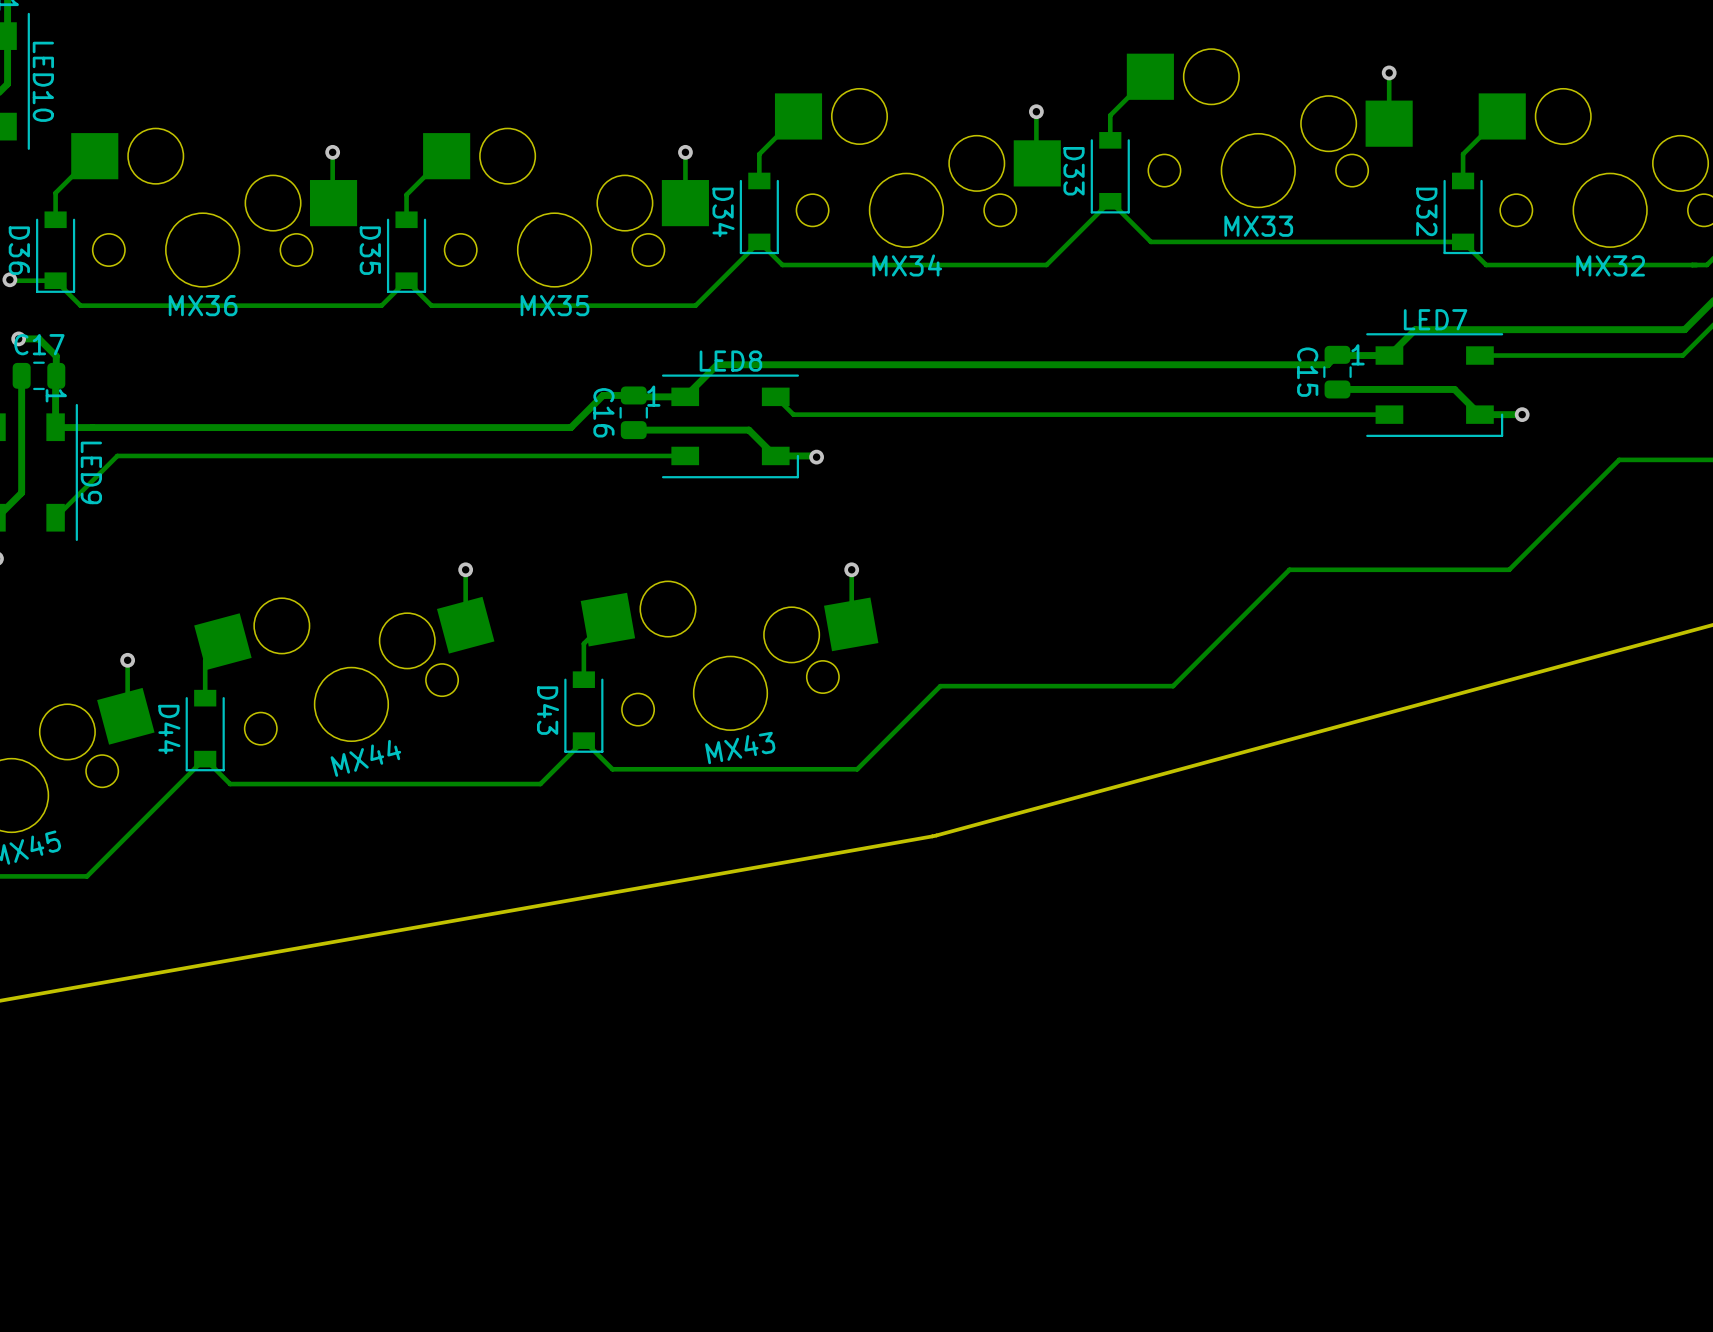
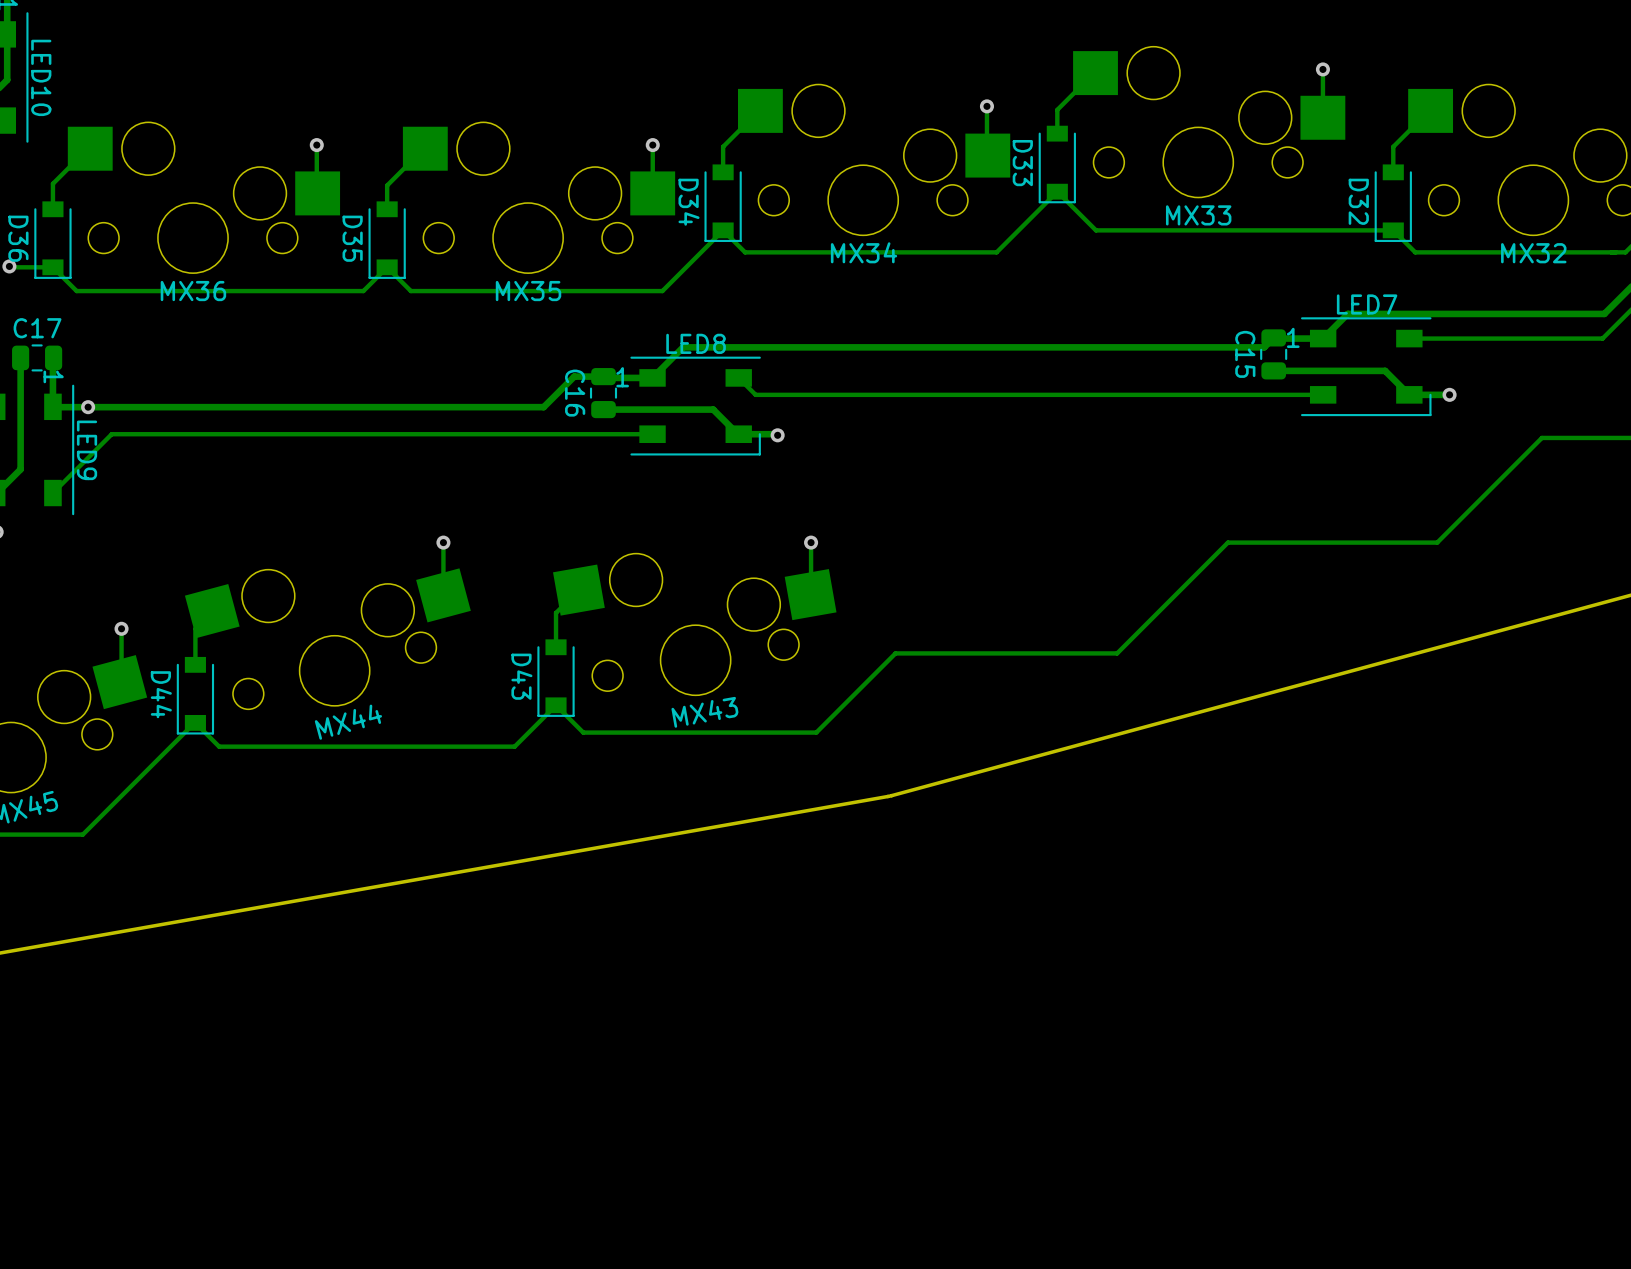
track: (18, 338) (38, 338) (56, 356) (56, 375) -> none
via: (18, 338) -> none
via: none -> (88, 407)

